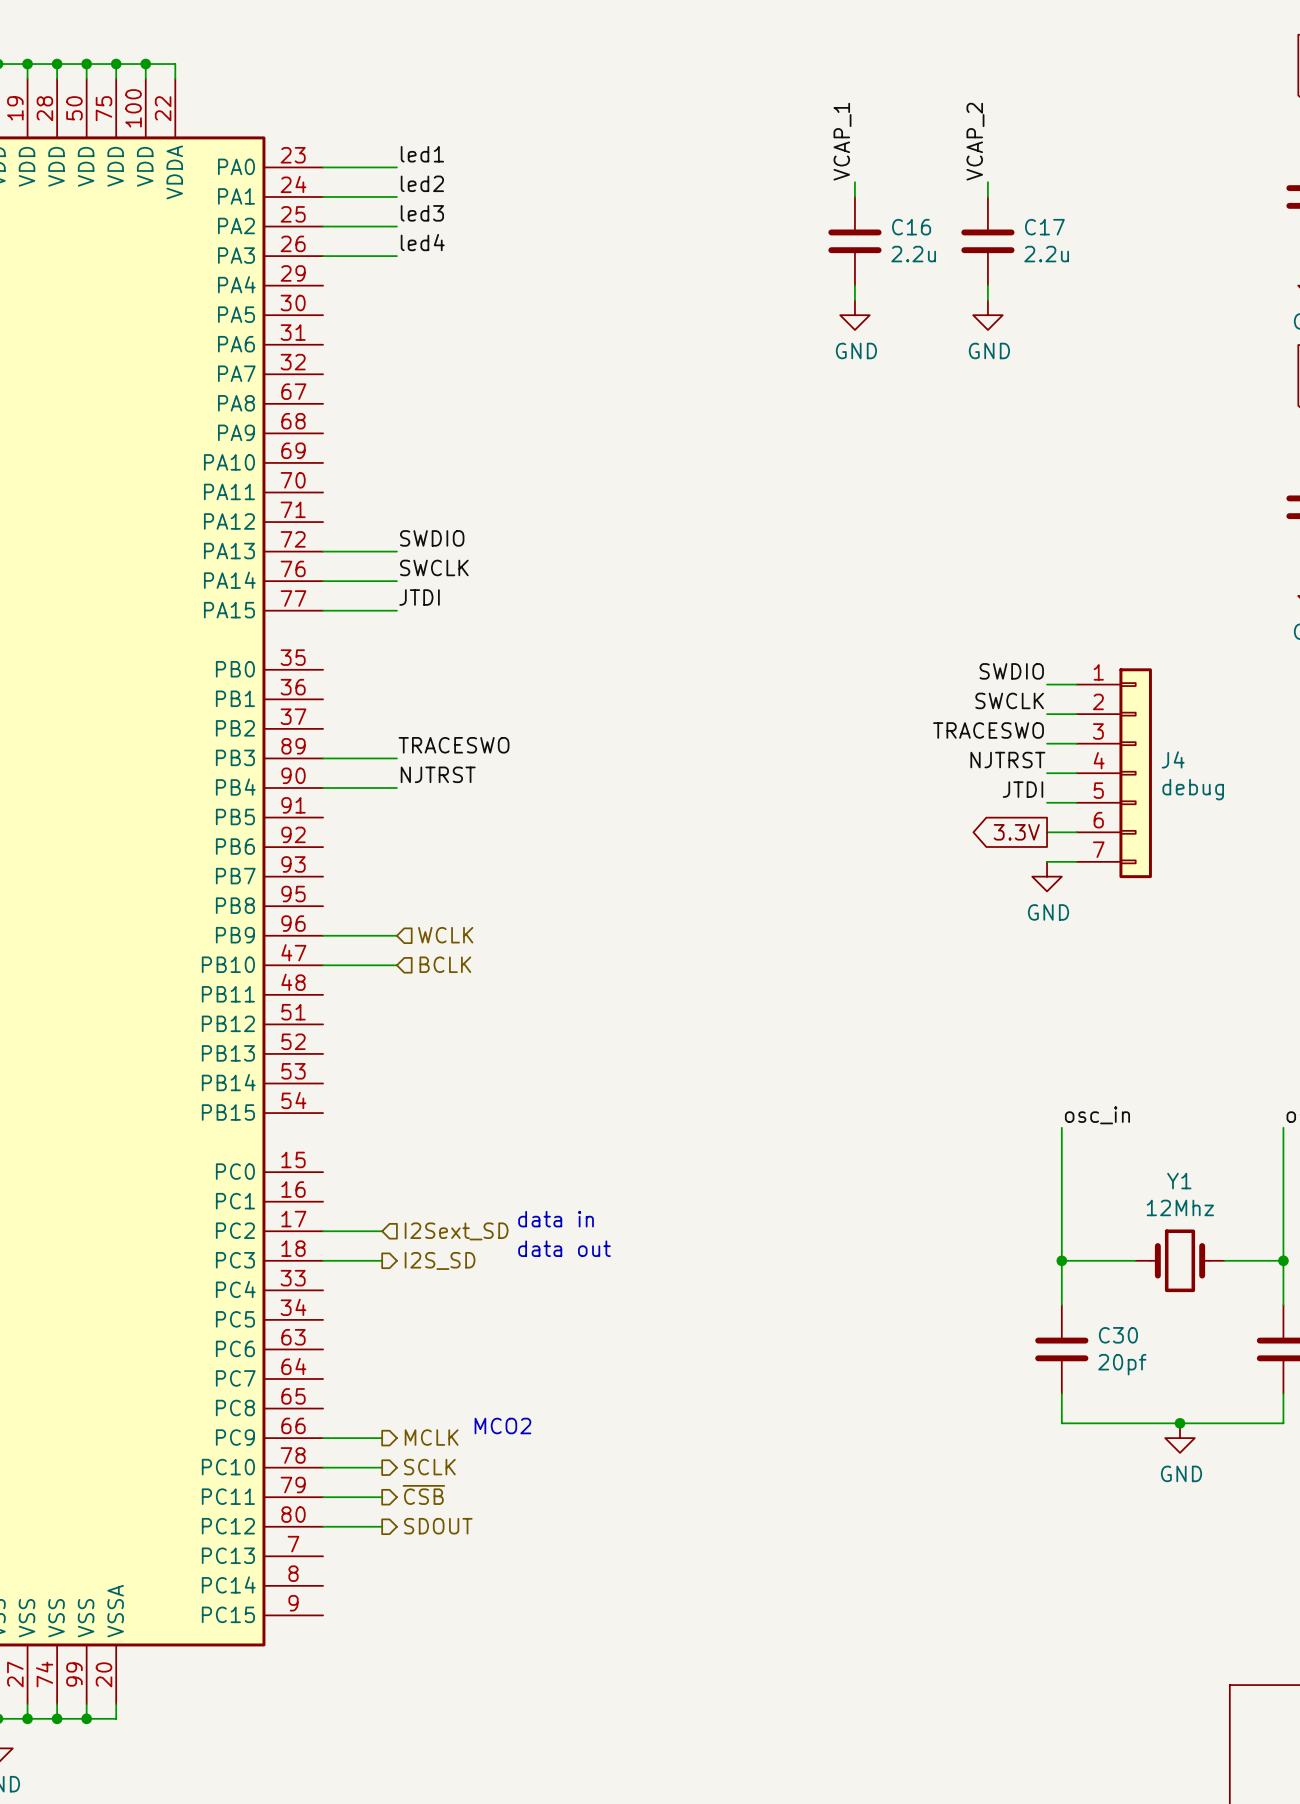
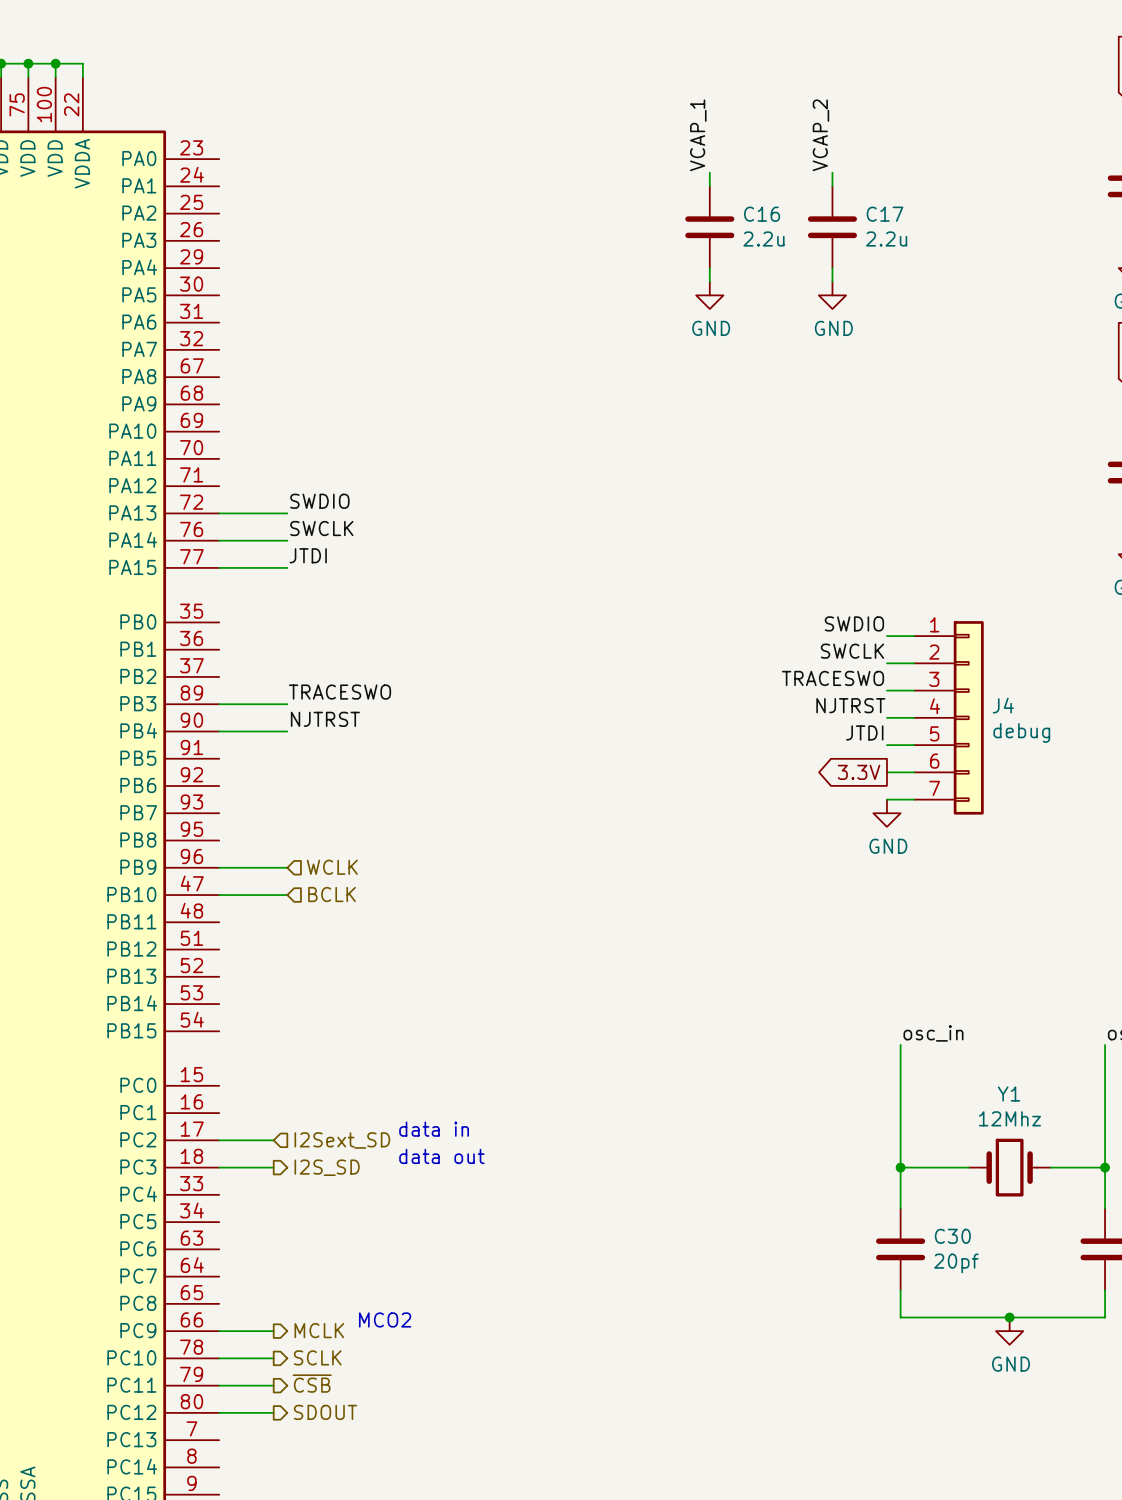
label: led1 (422, 154) -> none
wire: (323, 167) (396, 167) -> none
label: led2 (422, 183) -> none
wire: (323, 196) (396, 196) -> none
label: led3 (422, 213) -> none
wire: (323, 226) (396, 226) -> none
label: led4 (422, 242) -> none
wire: (323, 256) (396, 256) -> none

